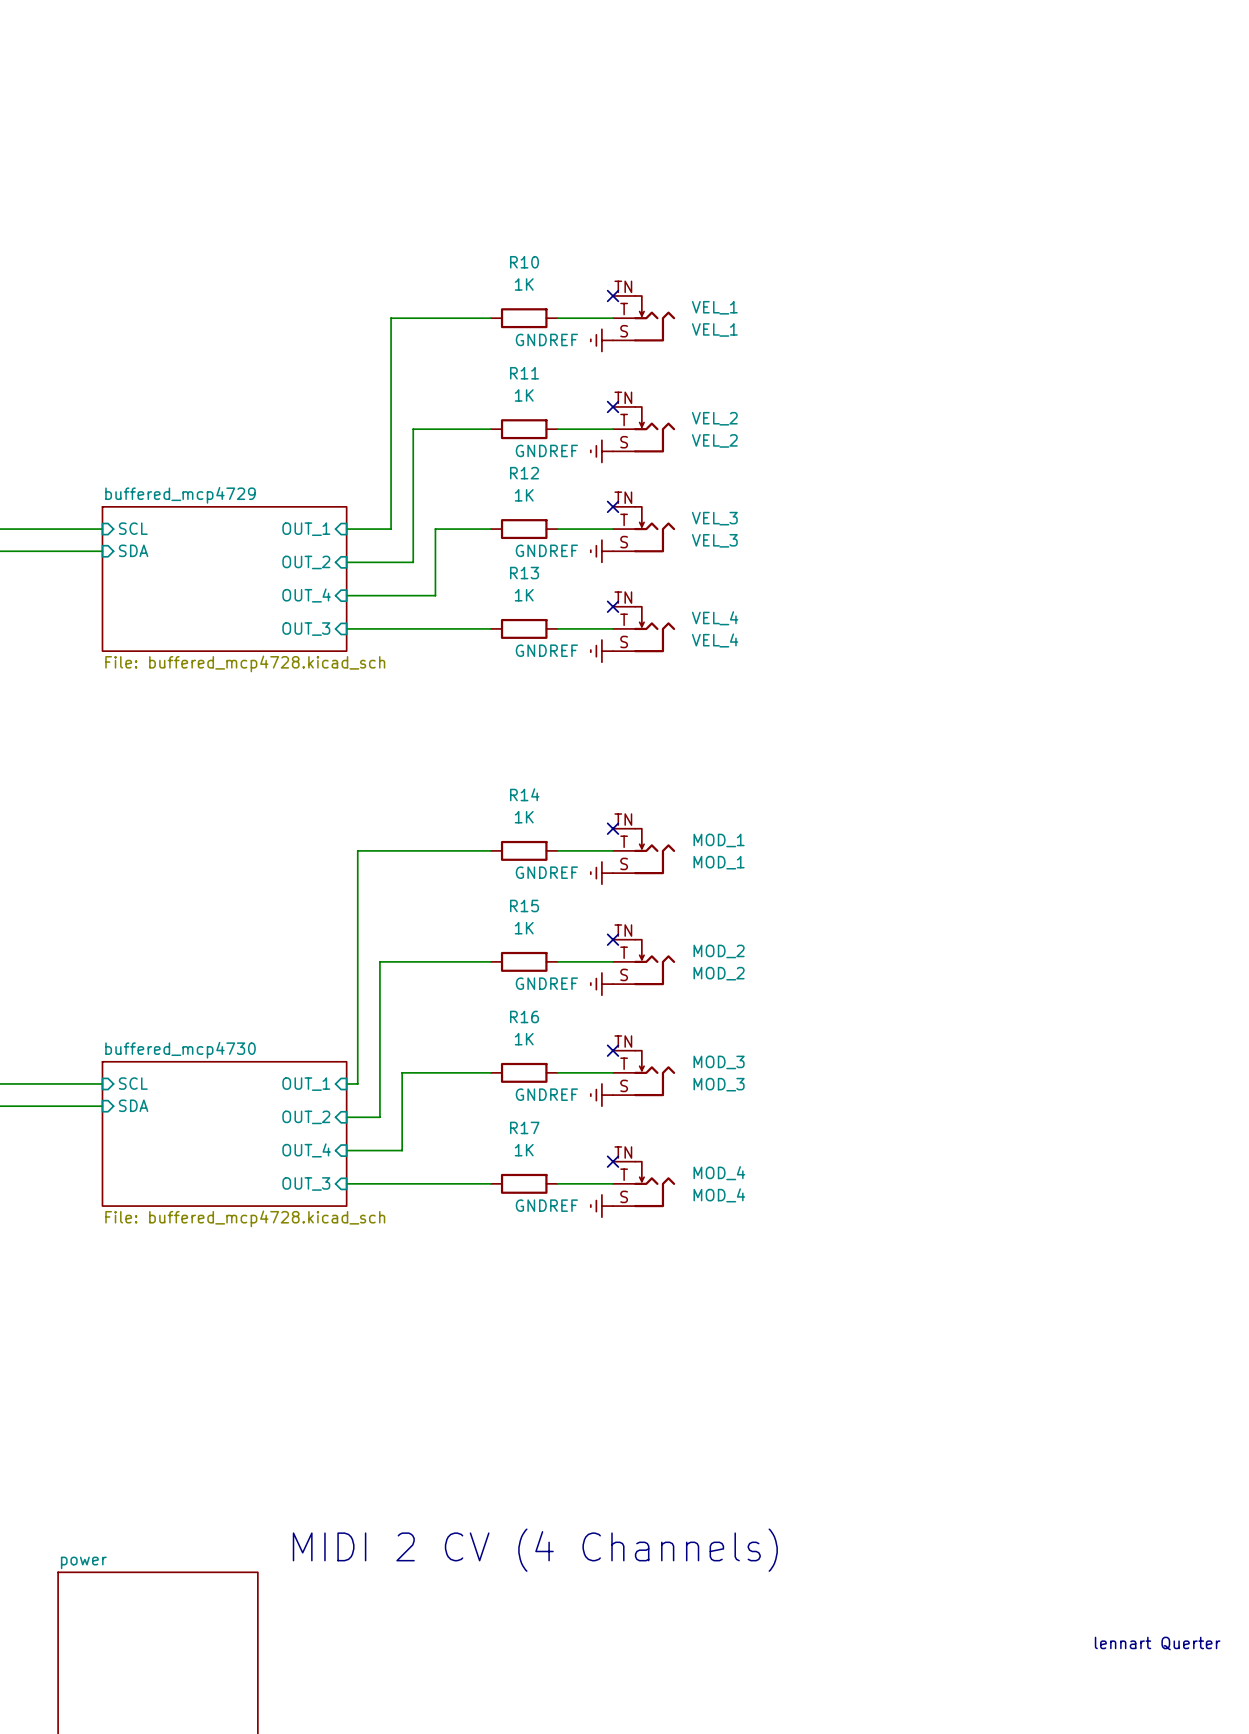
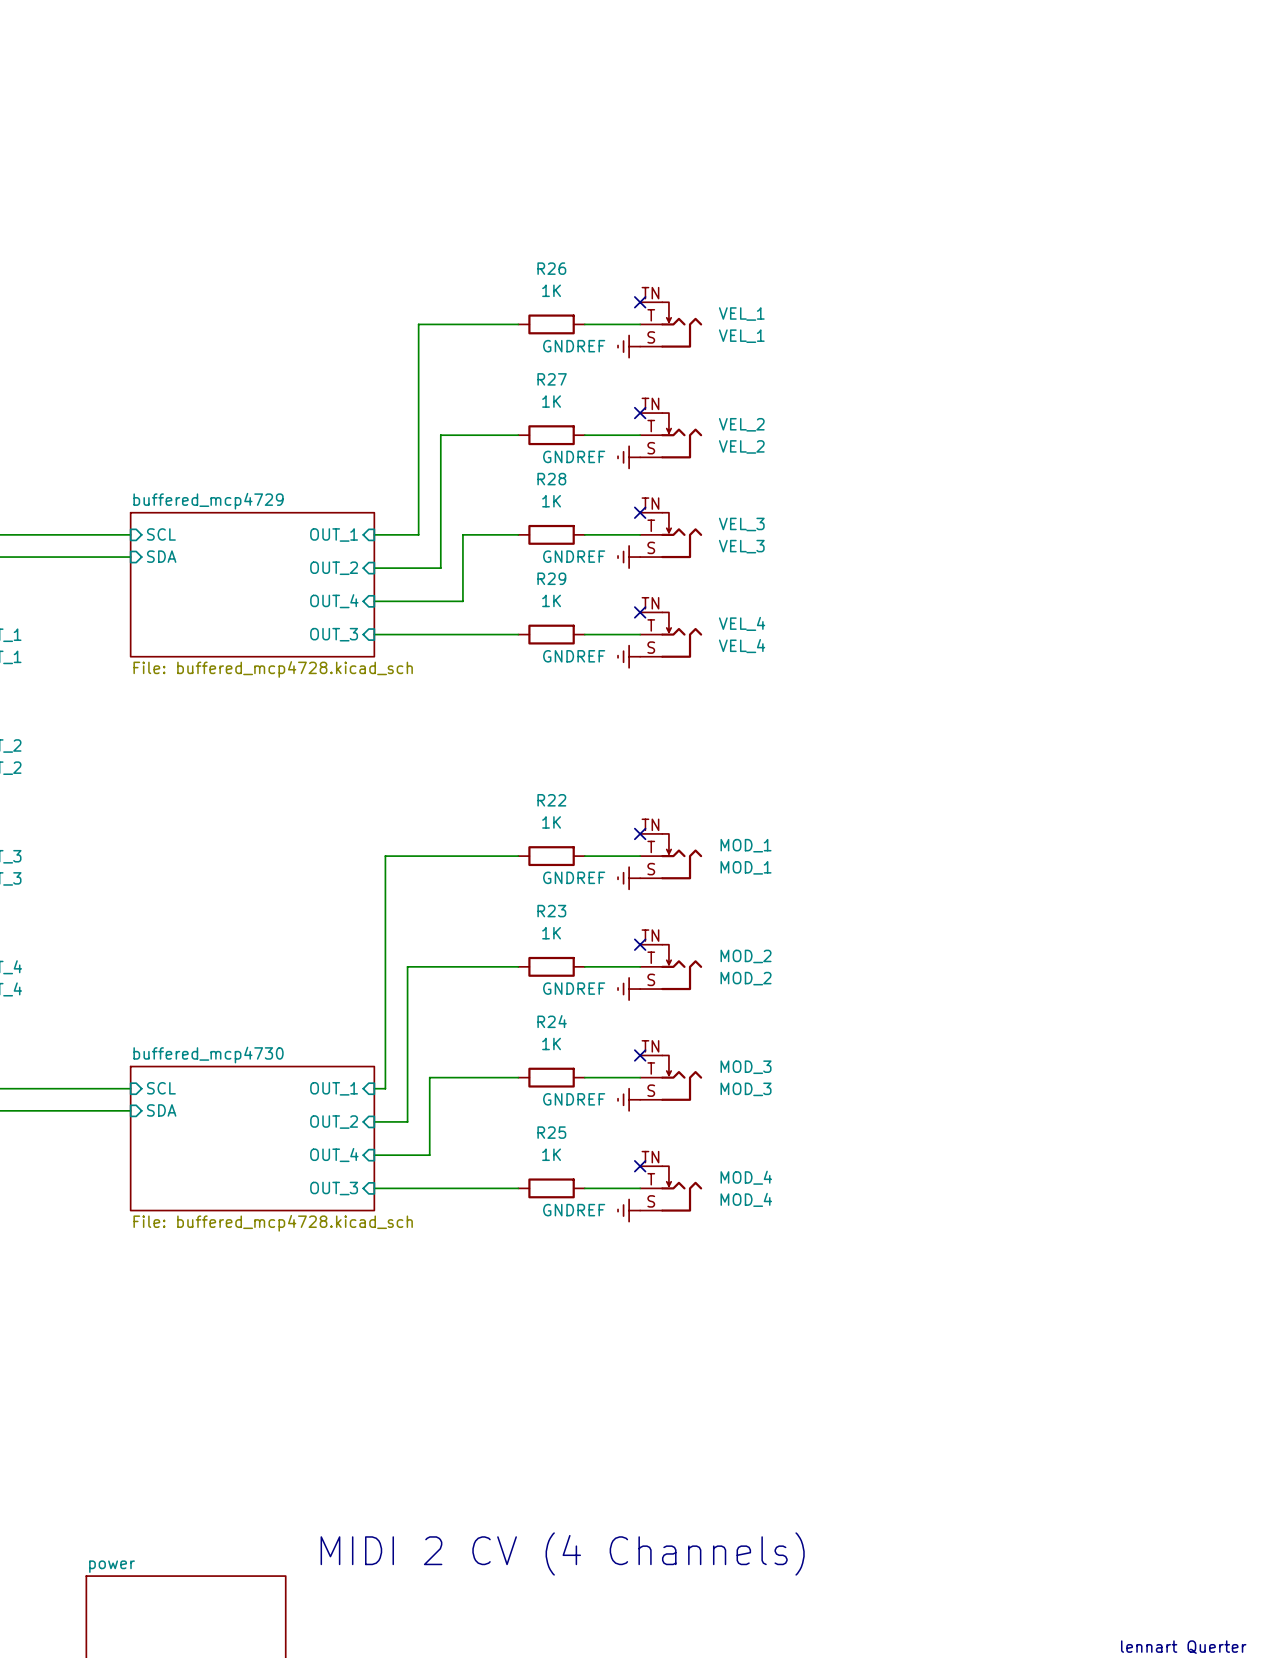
R10 name: R10 (524, 262) -> R26 (551, 268)
R11 name: R11 (524, 373) -> R27 (552, 379)
R12 name: R12 (524, 473) -> R28 (551, 479)
R13 name: R13 (524, 573) -> R29 (551, 578)
R14 name: R14 (524, 794) -> R22 (551, 800)
R15 name: R15 (524, 905) -> R23 (551, 911)
R16 name: R16 (524, 1016) -> R24 (552, 1021)
R17 name: R17 (524, 1127) -> R25 (551, 1132)

